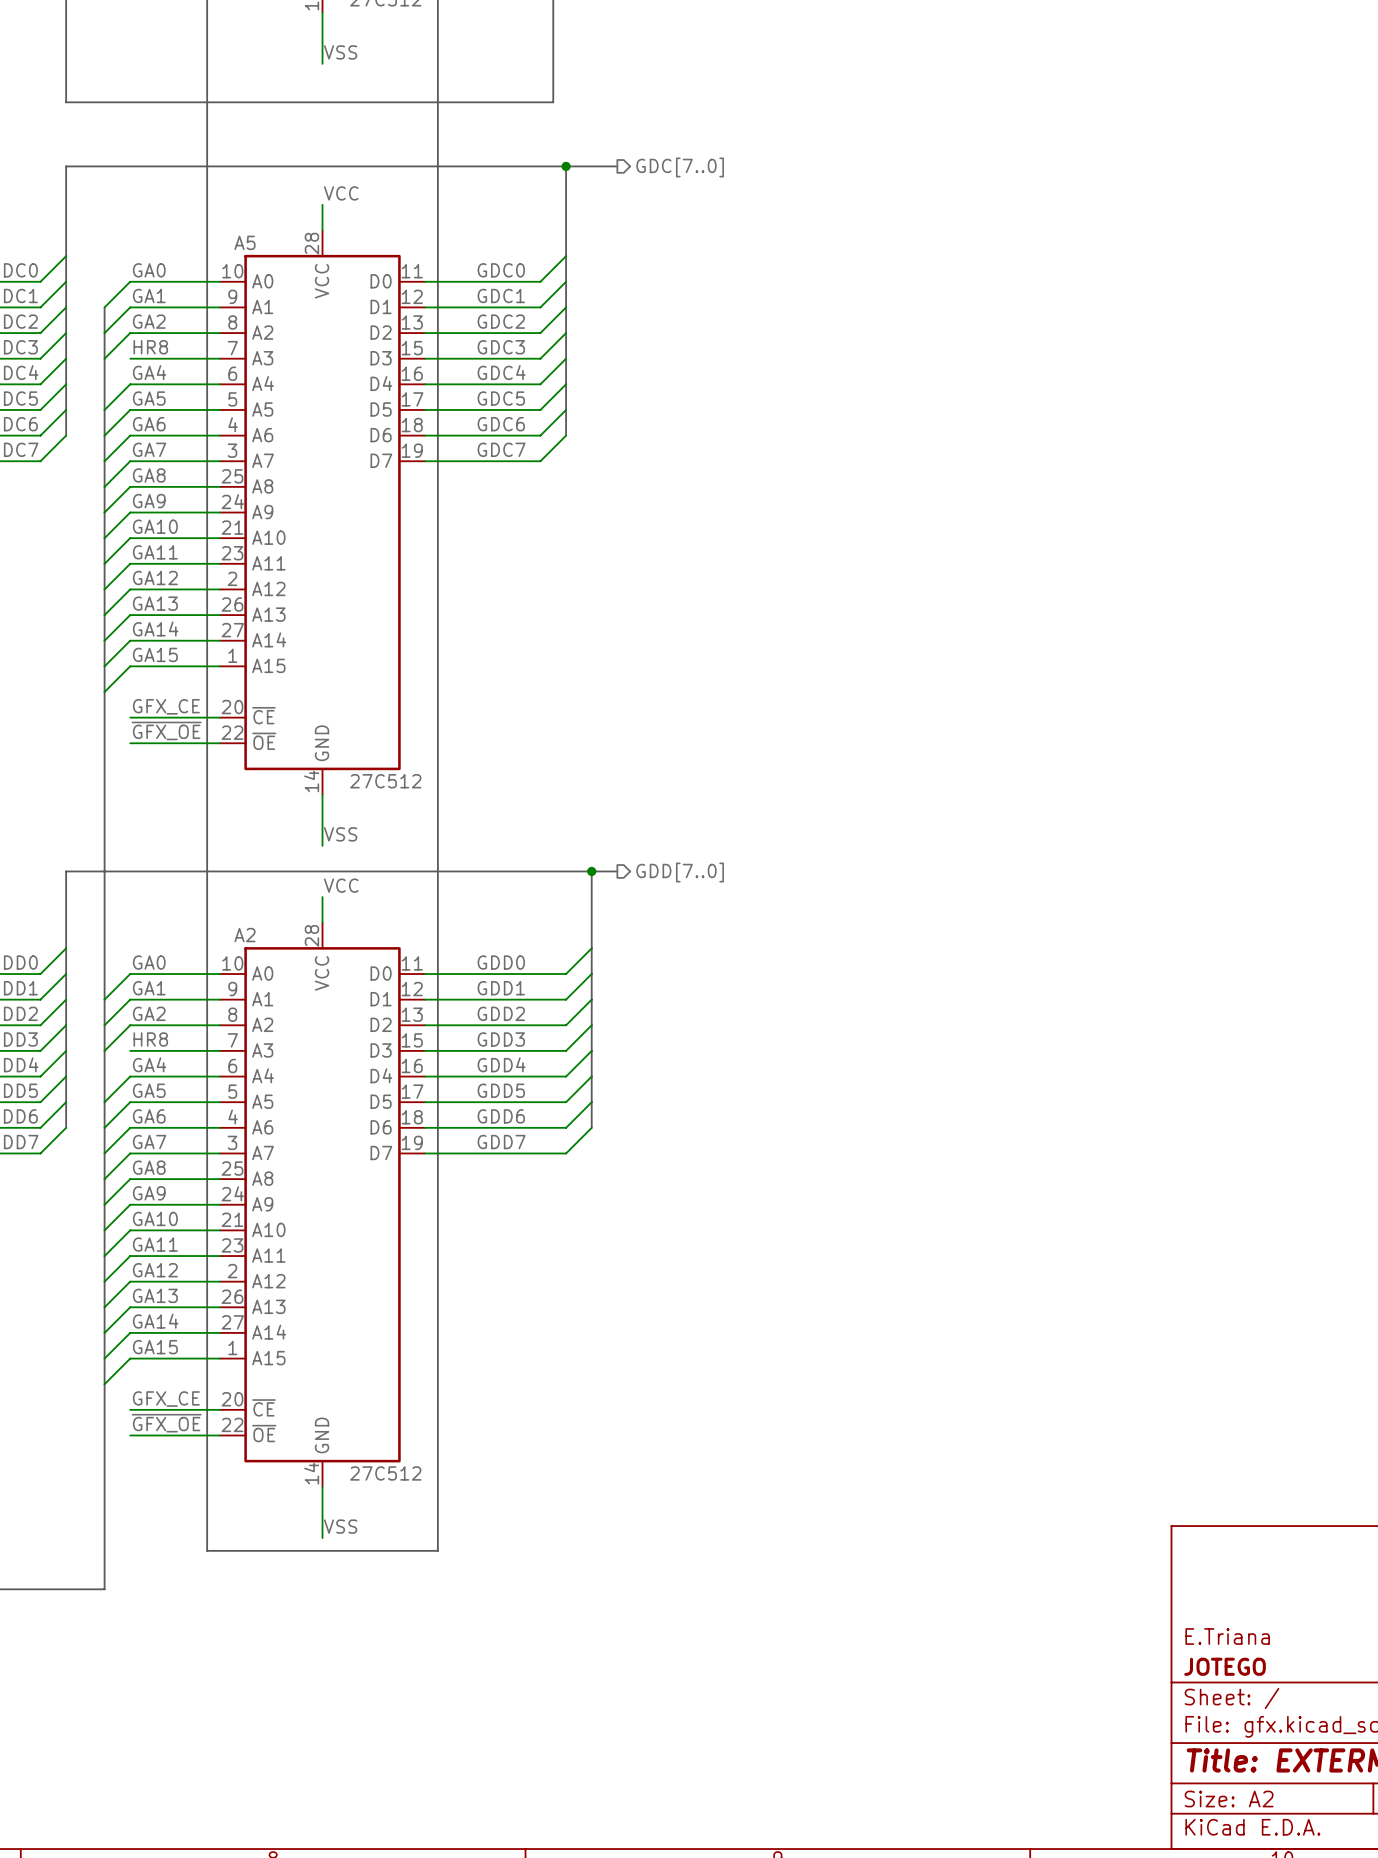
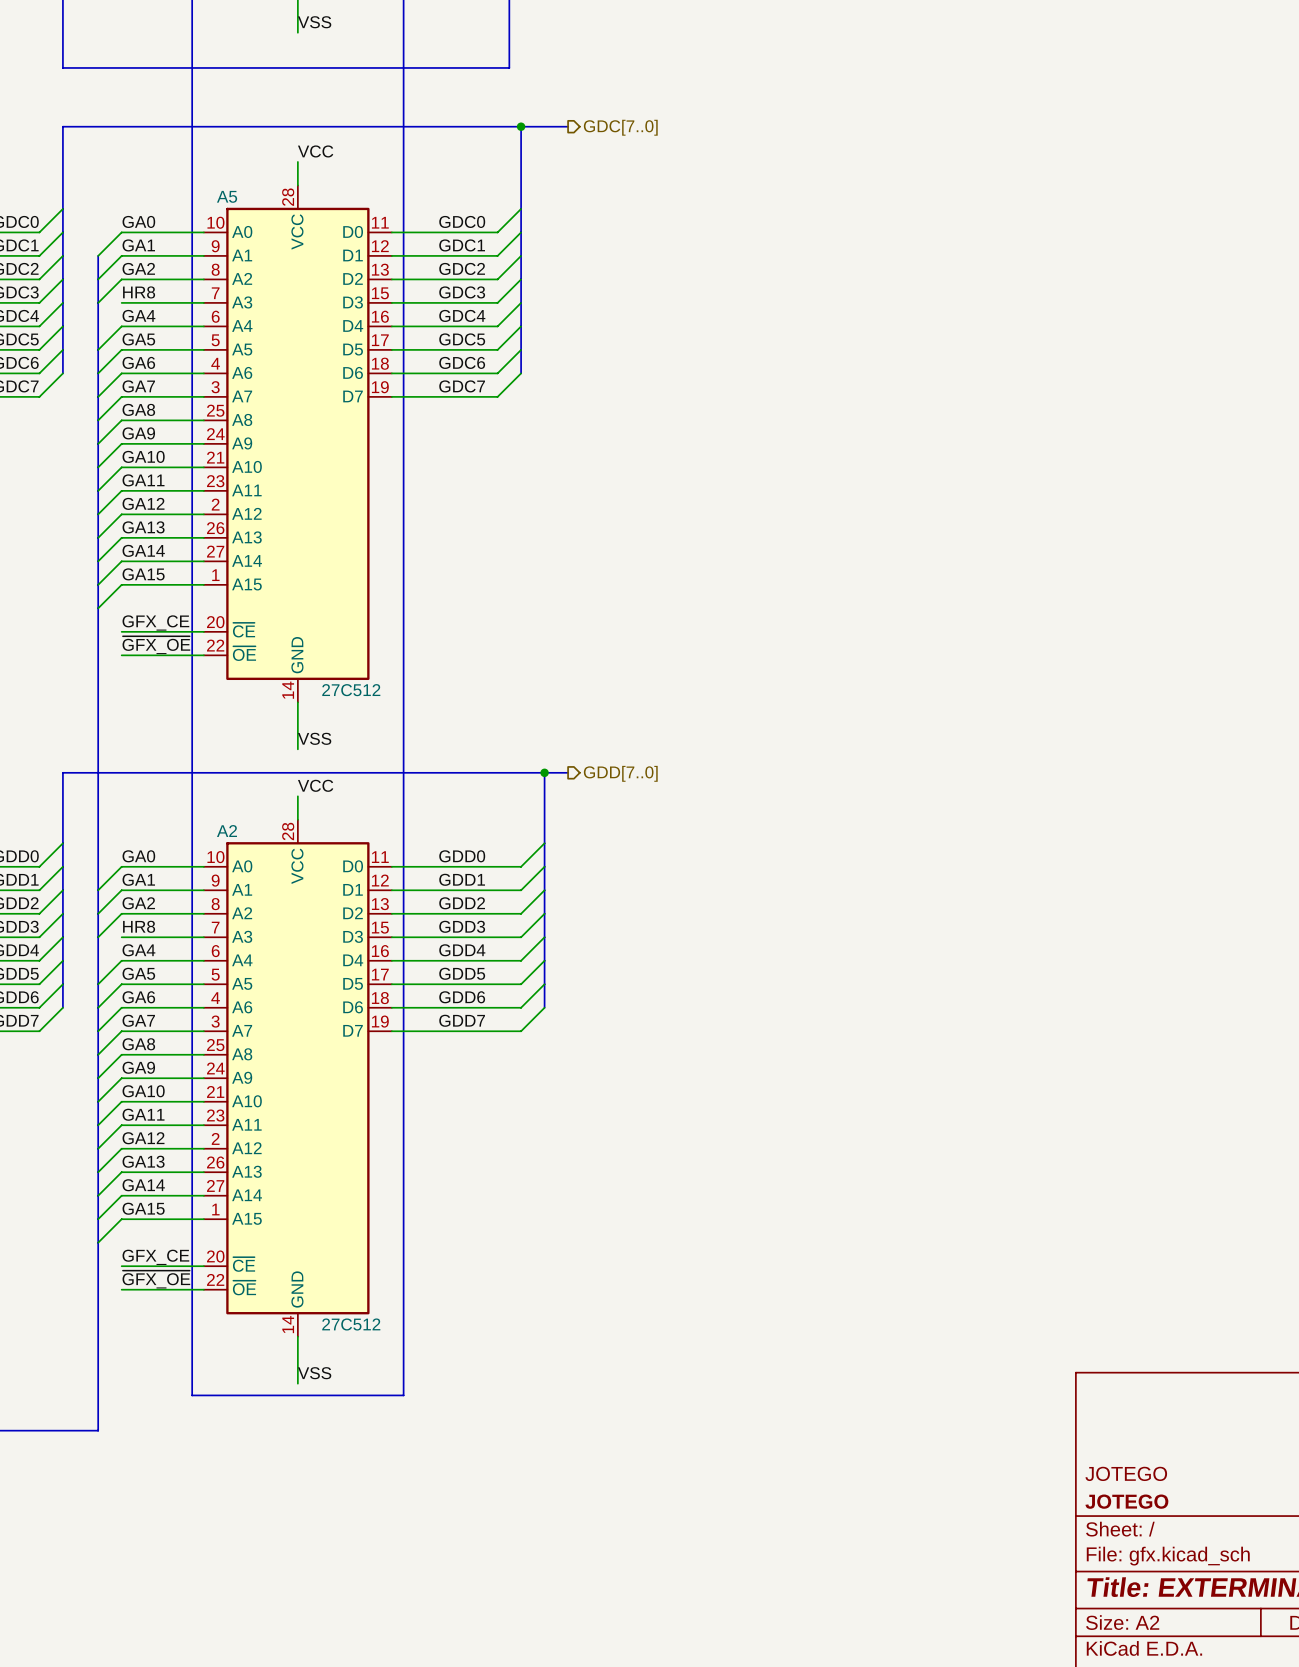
title block: E.Triana (1227, 1636) -> JOTEGO (1126, 1473)

